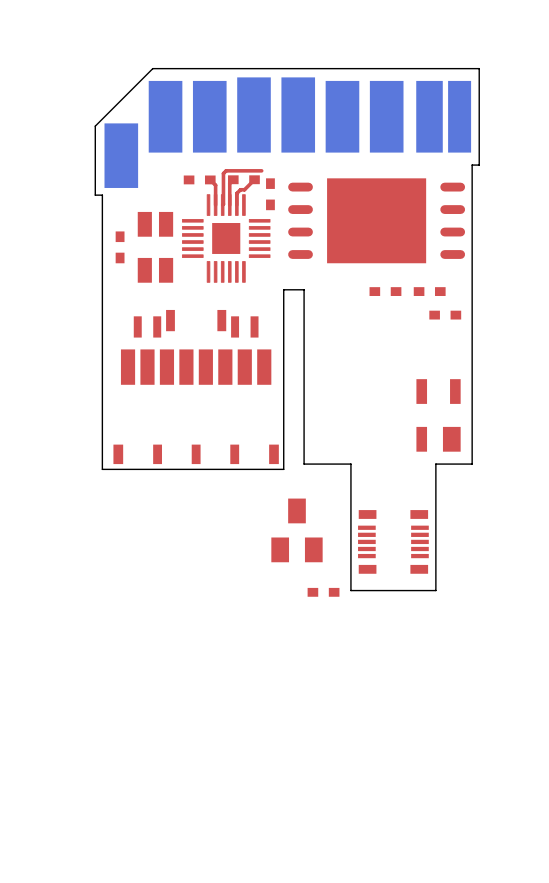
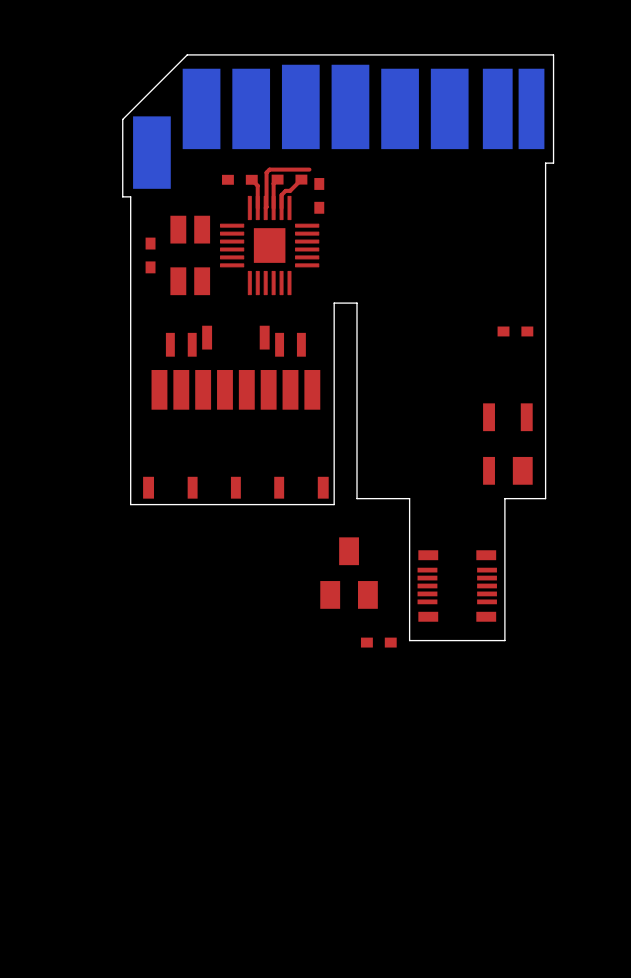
part: (376, 220) -> none
part: (385, 291) -> none
part: (429, 291) -> none

